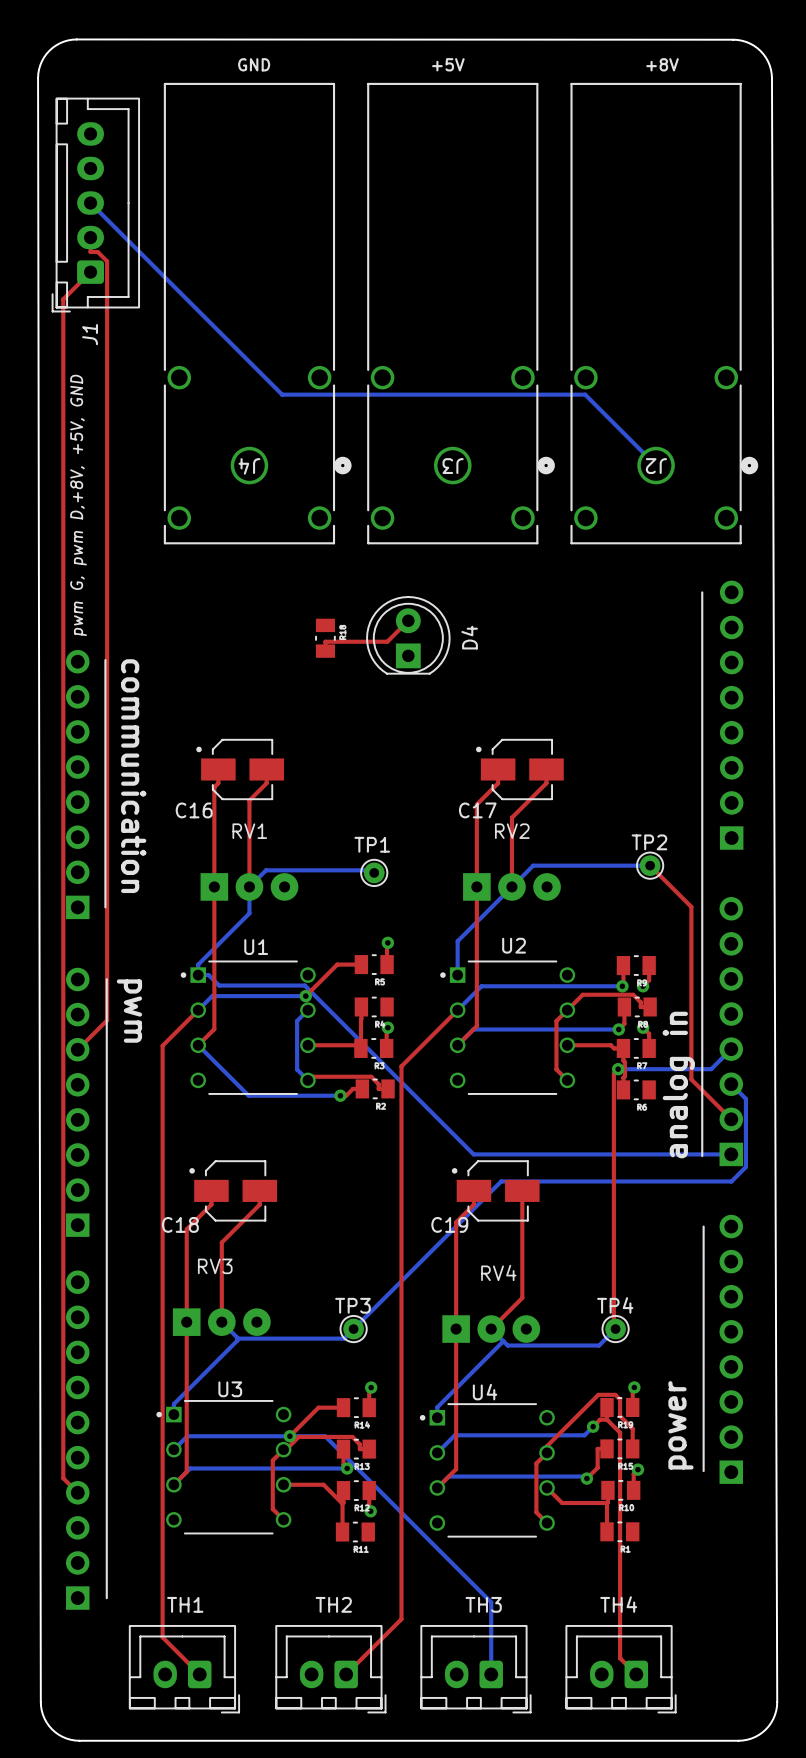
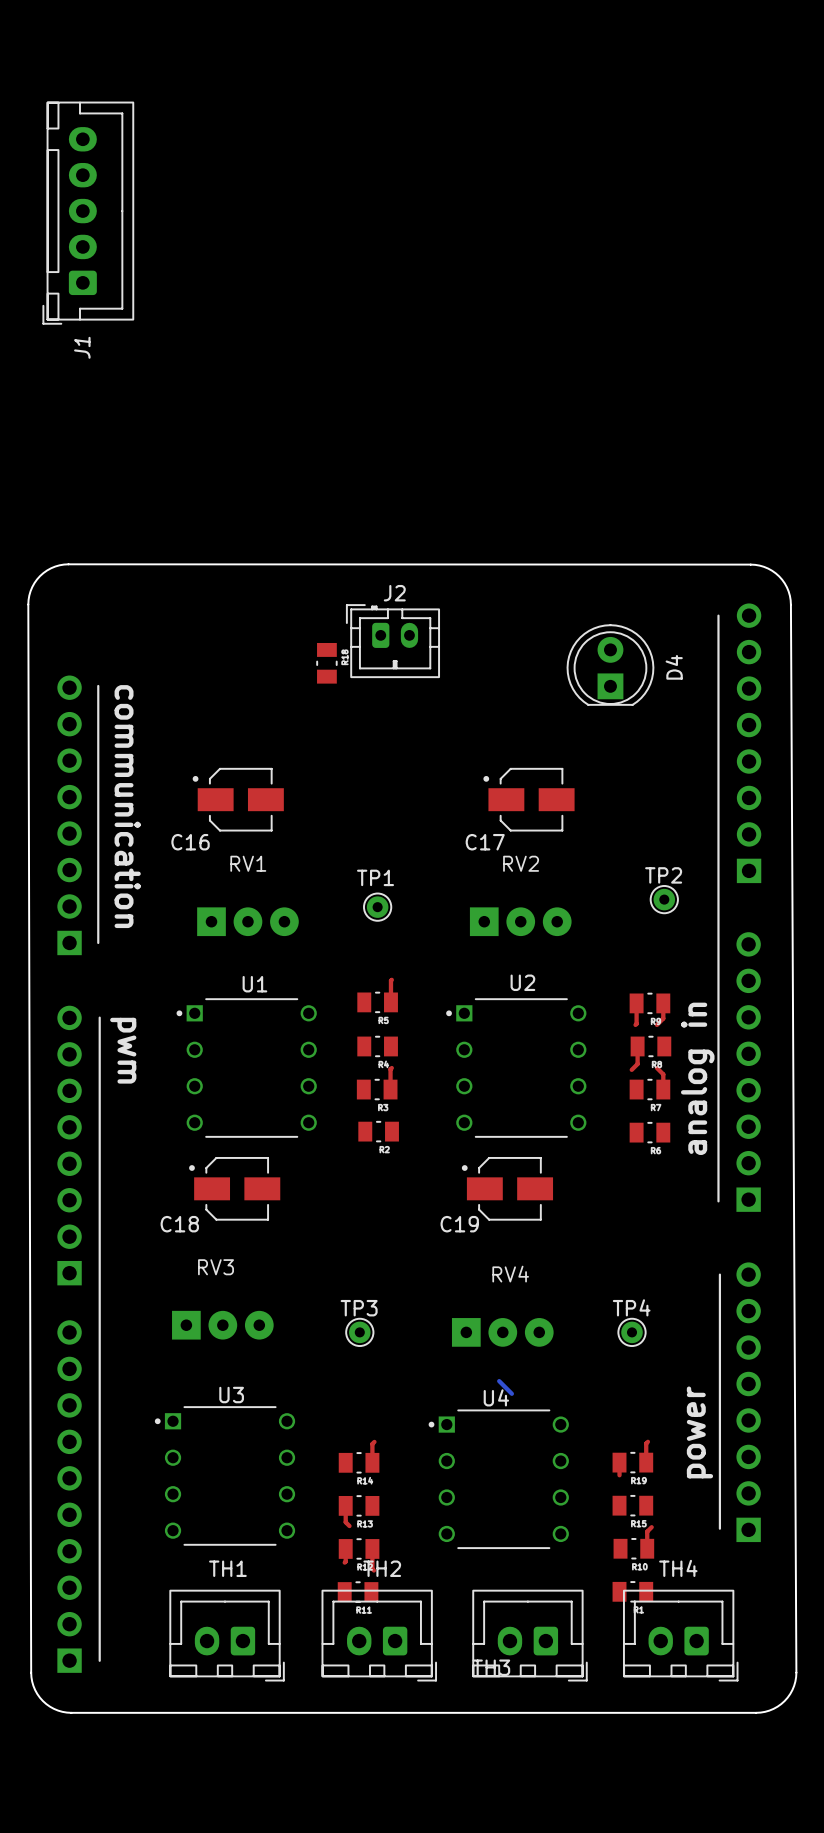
board edge: (76, 39) (733, 39) (753, 45) (763, 54) (769, 65) (771, 78) (777, 1702) (775, 1714) (768, 1726) (751, 1738) (738, 1740) (79, 1740) (58, 1734) (49, 1726) (43, 1714) (40, 1702) (38, 78) (40, 65) (49, 50) (63, 41) (76, 39) -> (68, 564) (750, 564) (768, 568) (779, 576) (784, 583) (788, 591) (790, 604) (796, 1672) (792, 1690) (787, 1697) (777, 1706) (765, 1711) (756, 1712) (71, 1712) (53, 1708) (42, 1701) (37, 1694) (33, 1685) (31, 1672) (28, 604) (32, 587) (40, 576) (55, 566) (68, 564)
text: GND (254, 64) -> none
text: +5V (448, 64) -> none
text: +8V (662, 64) -> none
J2 footprint: [570, 82, 759, 545] -> [346, 604, 440, 679]
bottom track: (90, 203) (282, 394) (585, 394) (656, 465) -> none
top track: (90, 237) (90, 251) (97, 251) (107, 261) (107, 1020) (77, 1049) -> none
top track: (90, 272) (63, 299) (63, 1478) (77, 1492) -> none
J4: (257, 313) -> none
J3: (461, 313) -> none
J2 name position: J2 (656, 466) -> J2 (394, 593)
text: pwm G, pwm D,+8V, +5V, GND (78, 505) -> none
top track: (408, 620) (387, 641) (325, 641) (325, 651) -> none
D4 position: (408, 635) -> (610, 665)
top track: (218, 769) (218, 783) (214, 787) (214, 1029) (198, 1045) -> none
top track: (266, 769) (266, 783) (249, 800) (249, 886) -> none
top track: (498, 769) (498, 783) (476, 804) (476, 1026) (457, 1045) -> none
top track: (546, 769) (546, 783) (511, 817) (511, 886) -> none
top track: (650, 865) (691, 906) (691, 1079) (731, 1119) -> none
bottom track: (650, 865) (533, 865) (457, 941) (457, 975) -> none
bottom track: (374, 872) (371, 870) (266, 870) (249, 886) (249, 913) (198, 964) (198, 975) (208, 975) (219, 985) (304, 985) (473, 1154) (731, 1154) -> none
via: (387, 942) -> none
top track: (361, 964) (337, 964) (305, 996) -> none
bottom track: (622, 986) (481, 986) (457, 1010) -> none
via: (622, 986) -> none
via: (643, 986) -> none
bottom track: (305, 996) (212, 996) (198, 1010) -> none
via: (305, 996) -> none
top track: (361, 1007) (360, 1048) -> none
top track: (650, 1007) (640, 1007) (640, 1002) (633, 994) (582, 994) (556, 1021) (556, 1069) (567, 1080) -> none
top track: (198, 1010) (162, 1045) (162, 1637) (199, 1674) -> none
bottom track: (307, 1010) (297, 1020) (297, 1069) (307, 1080) -> none
top track: (457, 1010) (401, 1066) (401, 1619) (346, 1674) -> none
via: (387, 1027) -> none
via: (643, 1027) -> none
bottom track: (618, 1029) (473, 1029) (457, 1045) -> none
via: (618, 1029) -> none
bottom track: (198, 1045) (248, 1095) (340, 1095) -> none
top track: (307, 1045) (360, 1045) -> none
top track: (567, 1045) (610, 1045) (614, 1048) (623, 1048) (624, 1062) (623, 1089) -> none
bottom track: (721, 1059) (731, 1049) (711, 1069) (618, 1069) -> none
top track: (618, 1069) (613, 1073) (613, 1327) (615, 1329) -> none
via: (618, 1069) -> none
top track: (307, 1080) (311, 1076) (371, 1076) (378, 1084) (378, 1088) (388, 1088) -> none
bottom track: (731, 1084) (745, 1098) (745, 1167) (731, 1181) (501, 1181) (344, 1338) (237, 1338) -> none
text position: analog in (678, 1085) -> analog in (697, 1078)
top track: (362, 1088) (352, 1088) (346, 1095) (340, 1095) -> none
via: (340, 1095) -> none
top track: (211, 1190) (211, 1204) (186, 1229) (186, 1471) (173, 1484) -> none
C18 position: (233, 1190) -> (234, 1188)
top track: (259, 1190) (259, 1204) (221, 1242) (221, 1322) -> none
top track: (473, 1190) (473, 1204) (456, 1222) (456, 1469) (437, 1487) -> none
C19 position: (495, 1190) -> (507, 1188)
top track: (522, 1190) (522, 1297) (491, 1329) -> none
bottom track: (221, 1322) (237, 1337) (237, 1340) (173, 1404) (173, 1414) -> none
RV3 position: (221, 1322) -> (222, 1325)
TP3 position: (353, 1329) -> (359, 1332)
RV4 position: (491, 1329) -> (502, 1332)
bottom track: (615, 1329) (599, 1345) (507, 1345) (503, 1341) (437, 1407) (437, 1417) -> none
TP4 position: (615, 1329) -> (632, 1332)
via: (371, 1387) -> none
via: (634, 1387) -> none
top track: (343, 1407) (318, 1407) (289, 1436) -> none
text position: power (680, 1425) -> power (699, 1432)
top track: (593, 1426) (600, 1419) (607, 1419) (620, 1432) (620, 1658) (636, 1674) -> none
bottom track: (593, 1426) (584, 1435) (454, 1435) (437, 1452) -> none
via: (593, 1426) -> none
via: (289, 1436) -> none
top track: (607, 1448) (597, 1448) (597, 1467) (586, 1478) -> none
top track: (632, 1448) (632, 1428) (620, 1416) (620, 1399) (615, 1394) (598, 1394) (547, 1446) (547, 1452) (536, 1463) (536, 1512) (547, 1523) -> none
bottom track: (173, 1449) (187, 1436) (325, 1436) (491, 1602) (491, 1674) -> none
top track: (369, 1449) (359, 1449) (359, 1444) (352, 1436) (298, 1436) (272, 1460) (272, 1509) (283, 1519) -> none
U3 position: (223, 1467) -> (224, 1475)
bottom track: (347, 1468) (190, 1468) (173, 1484) -> none
via: (347, 1468) -> none
via: (637, 1469) -> none
U4 position: (487, 1470) -> (498, 1479)
bottom track: (586, 1478) (584, 1476) (448, 1476) (437, 1487) -> none
via: (586, 1478) -> none
top track: (283, 1484) (323, 1484) (342, 1503) (342, 1532) -> none
top track: (547, 1487) (562, 1503) (607, 1503) (607, 1490) -> none
top track: (607, 1503) (607, 1531) -> none
via: (370, 1511) -> none
TH1 position: (184, 1669) -> (227, 1635)
TH2 position: (330, 1669) -> (379, 1635)
part position: (475, 1669) -> (530, 1635)
TH4 position: (621, 1669) -> (680, 1635)

